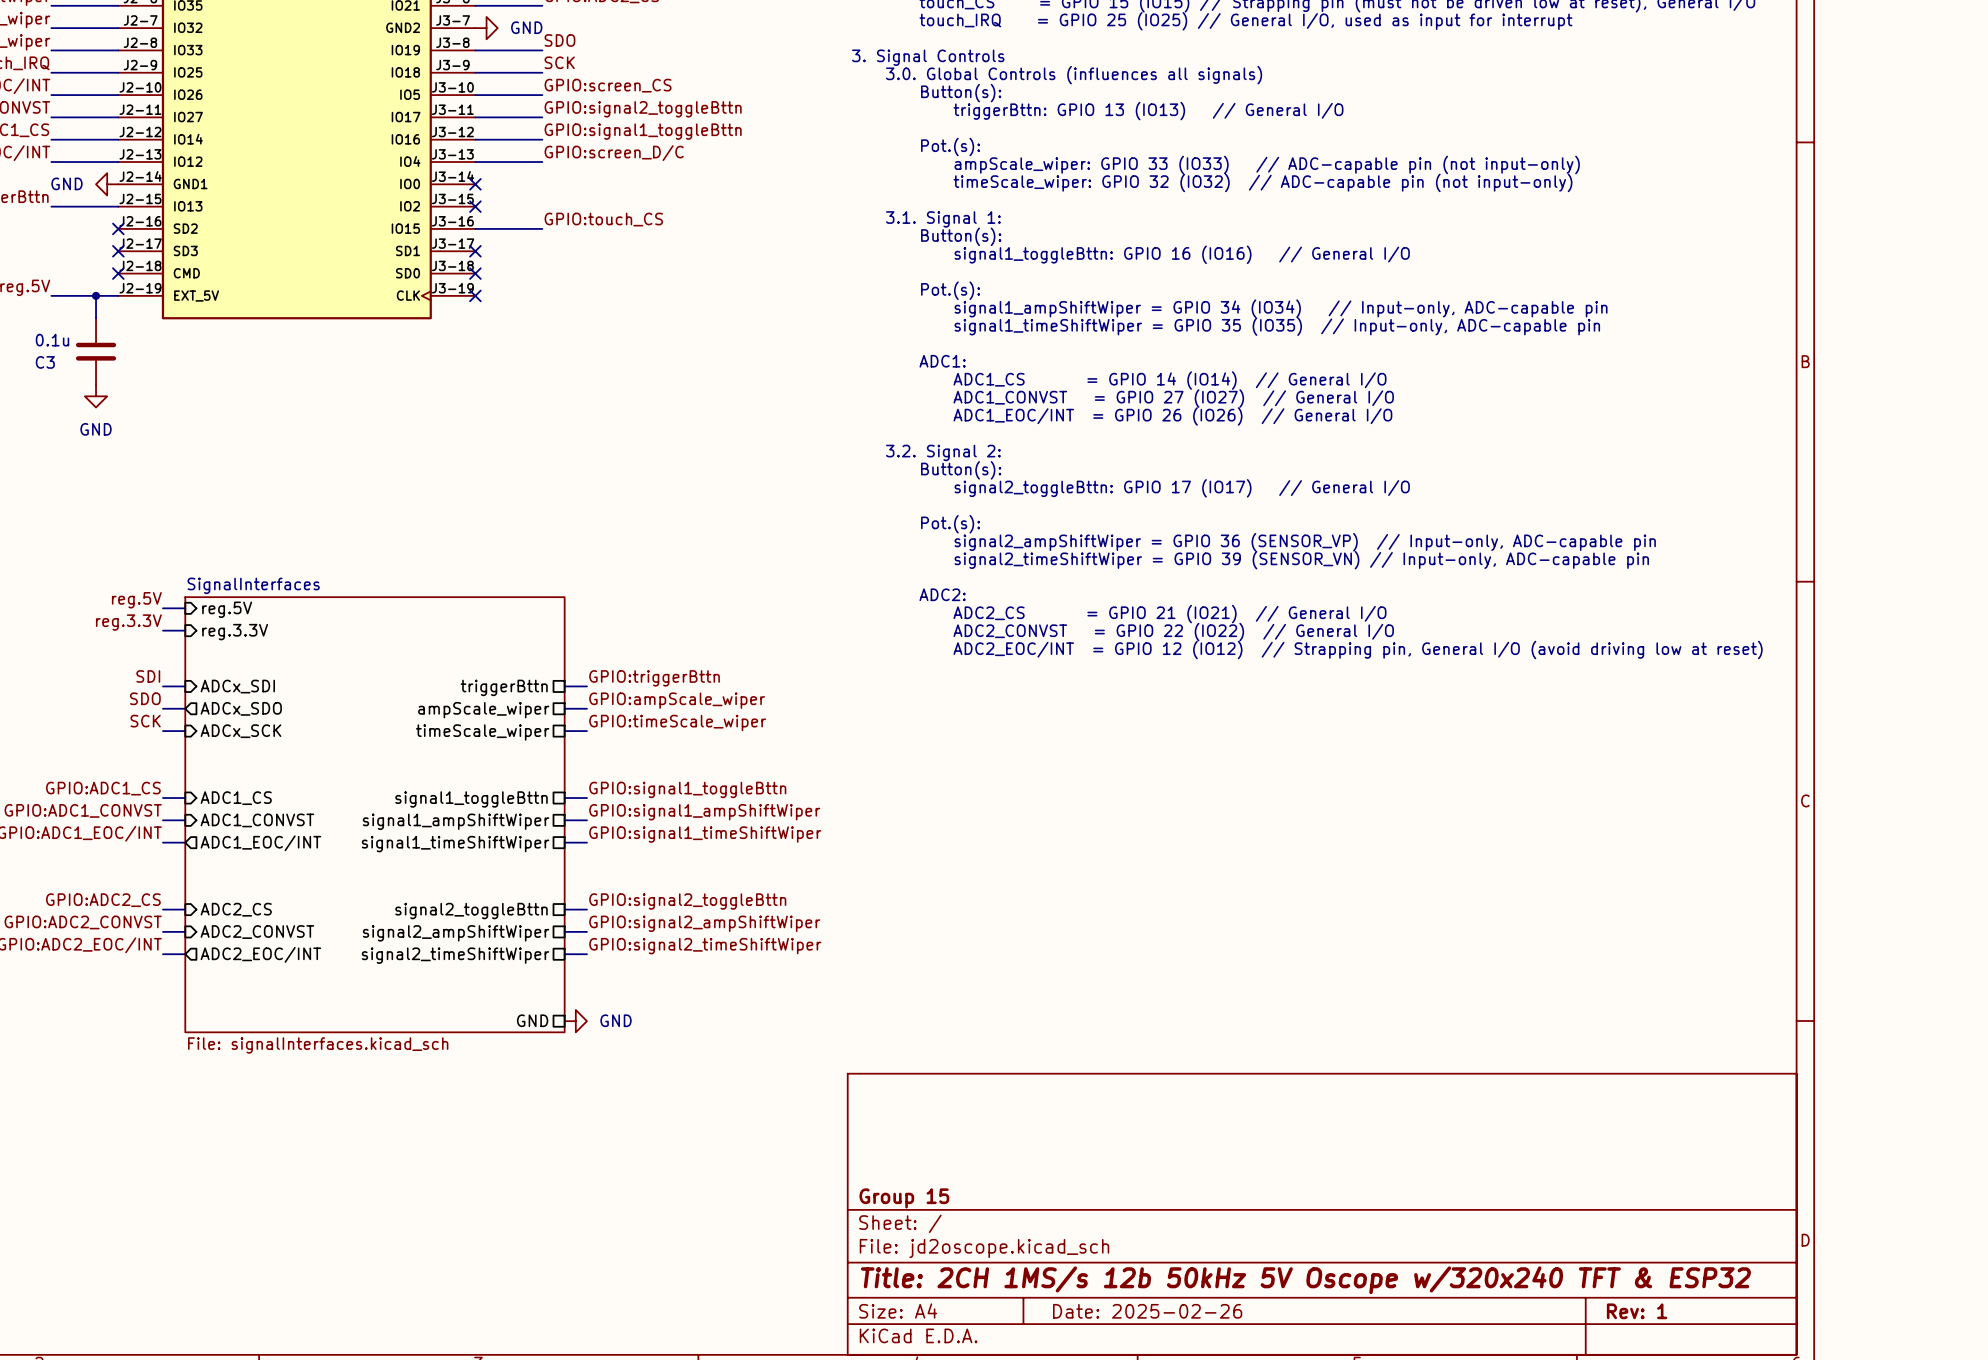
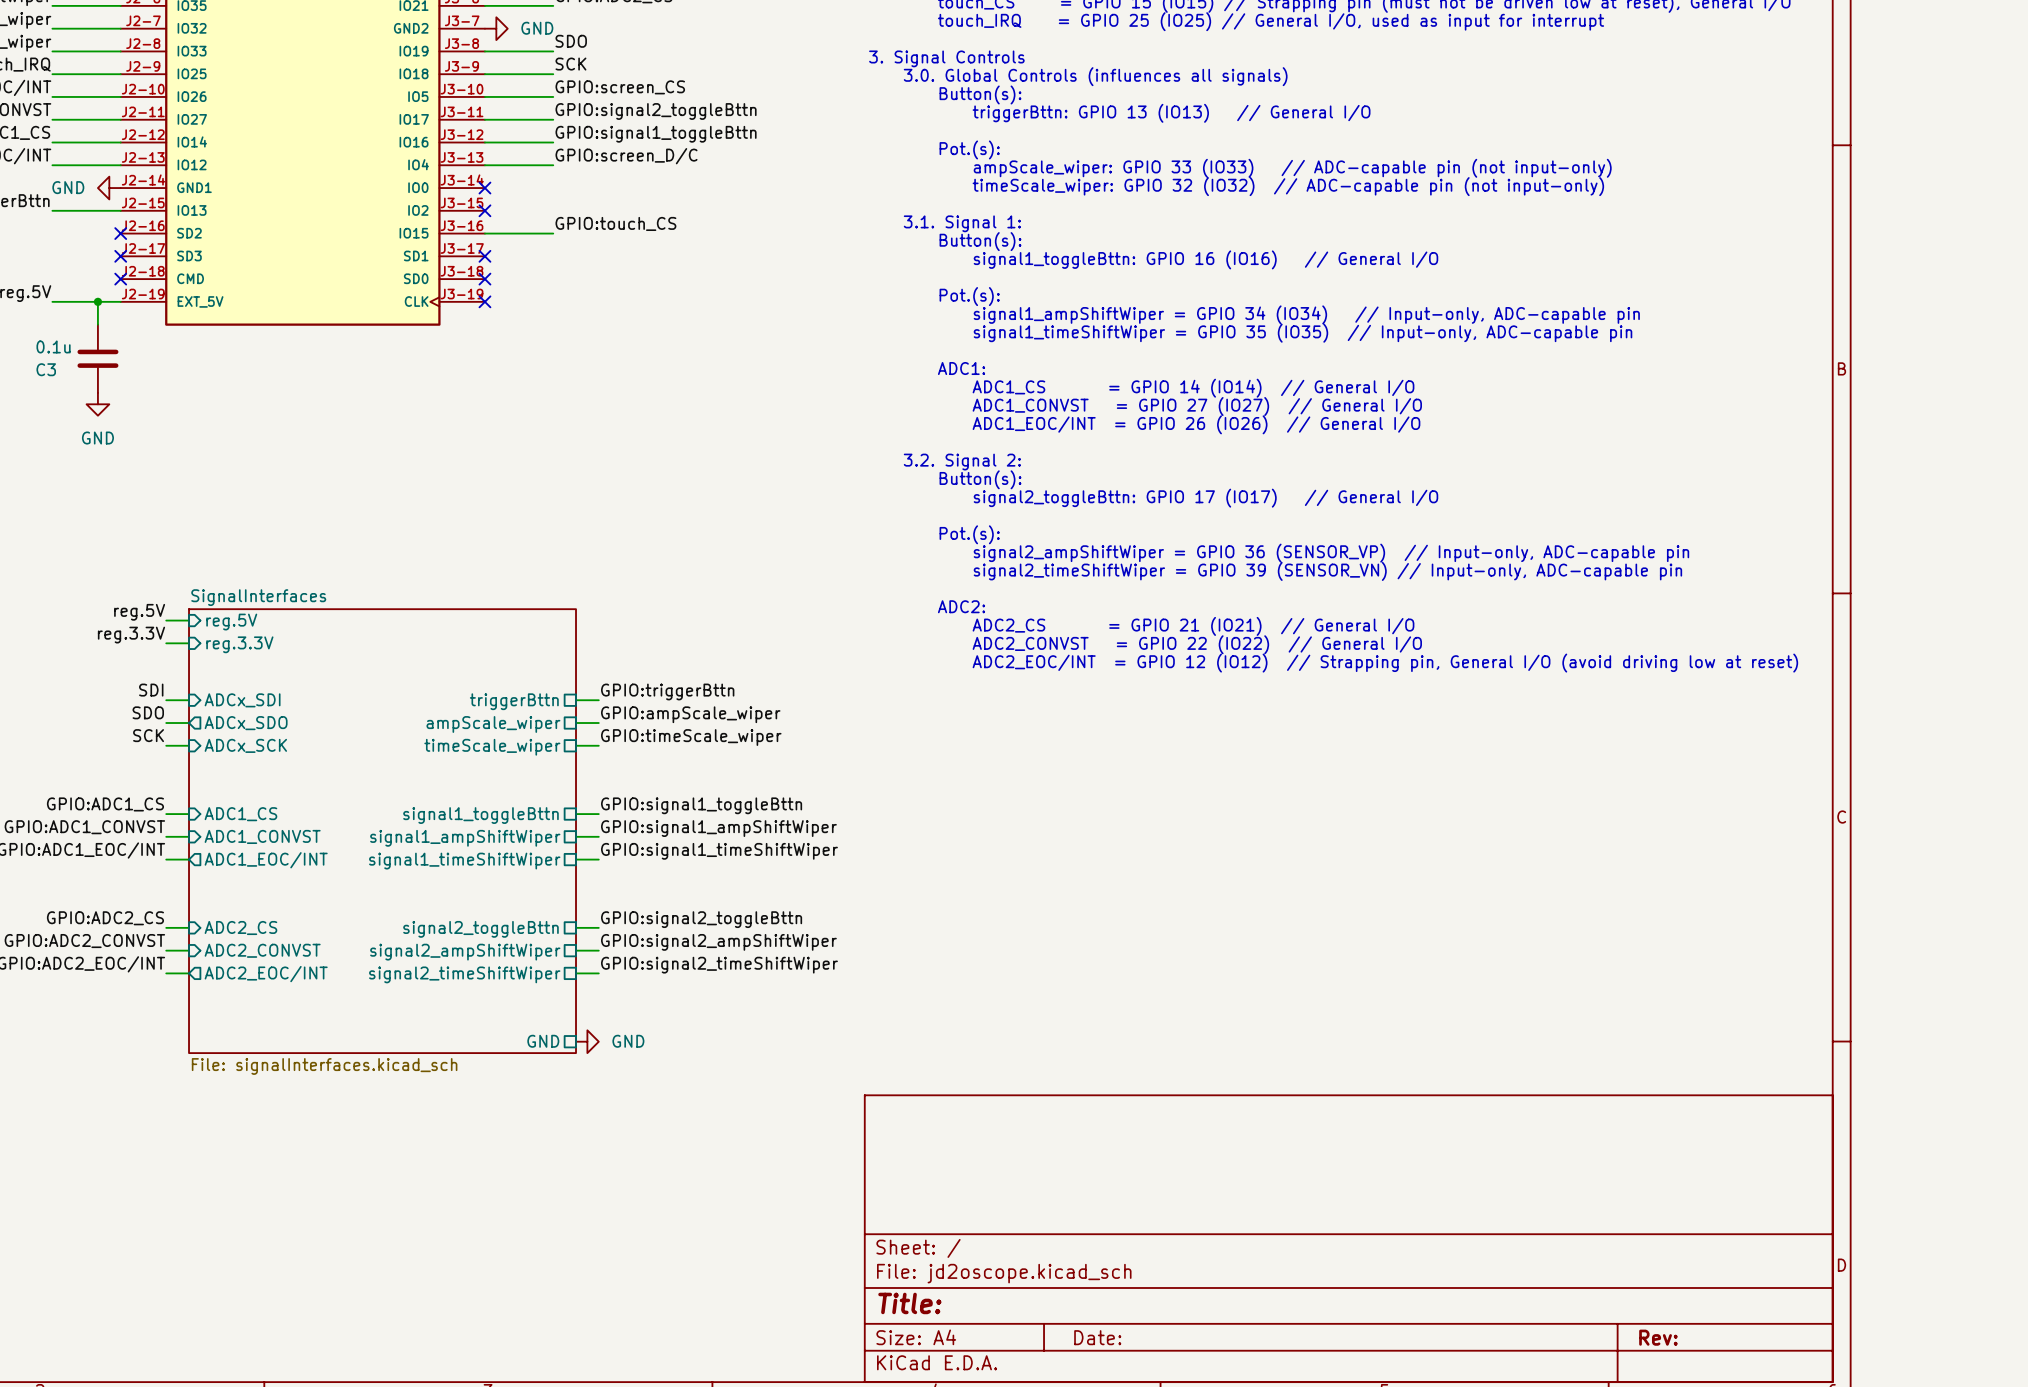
title block: Group 15 (904, 1198) -> none
title block: Title: 2CH 1MS/s 12b 50kHz 5V Oscope w/320x240 TFT & ESP32 (1305, 1280) -> Title: (909, 1303)
title block: Date: 2025-02-26 (1147, 1311) -> Date: (1097, 1337)
title block: Rev: 1 (1637, 1311) -> Rev: (1658, 1337)

